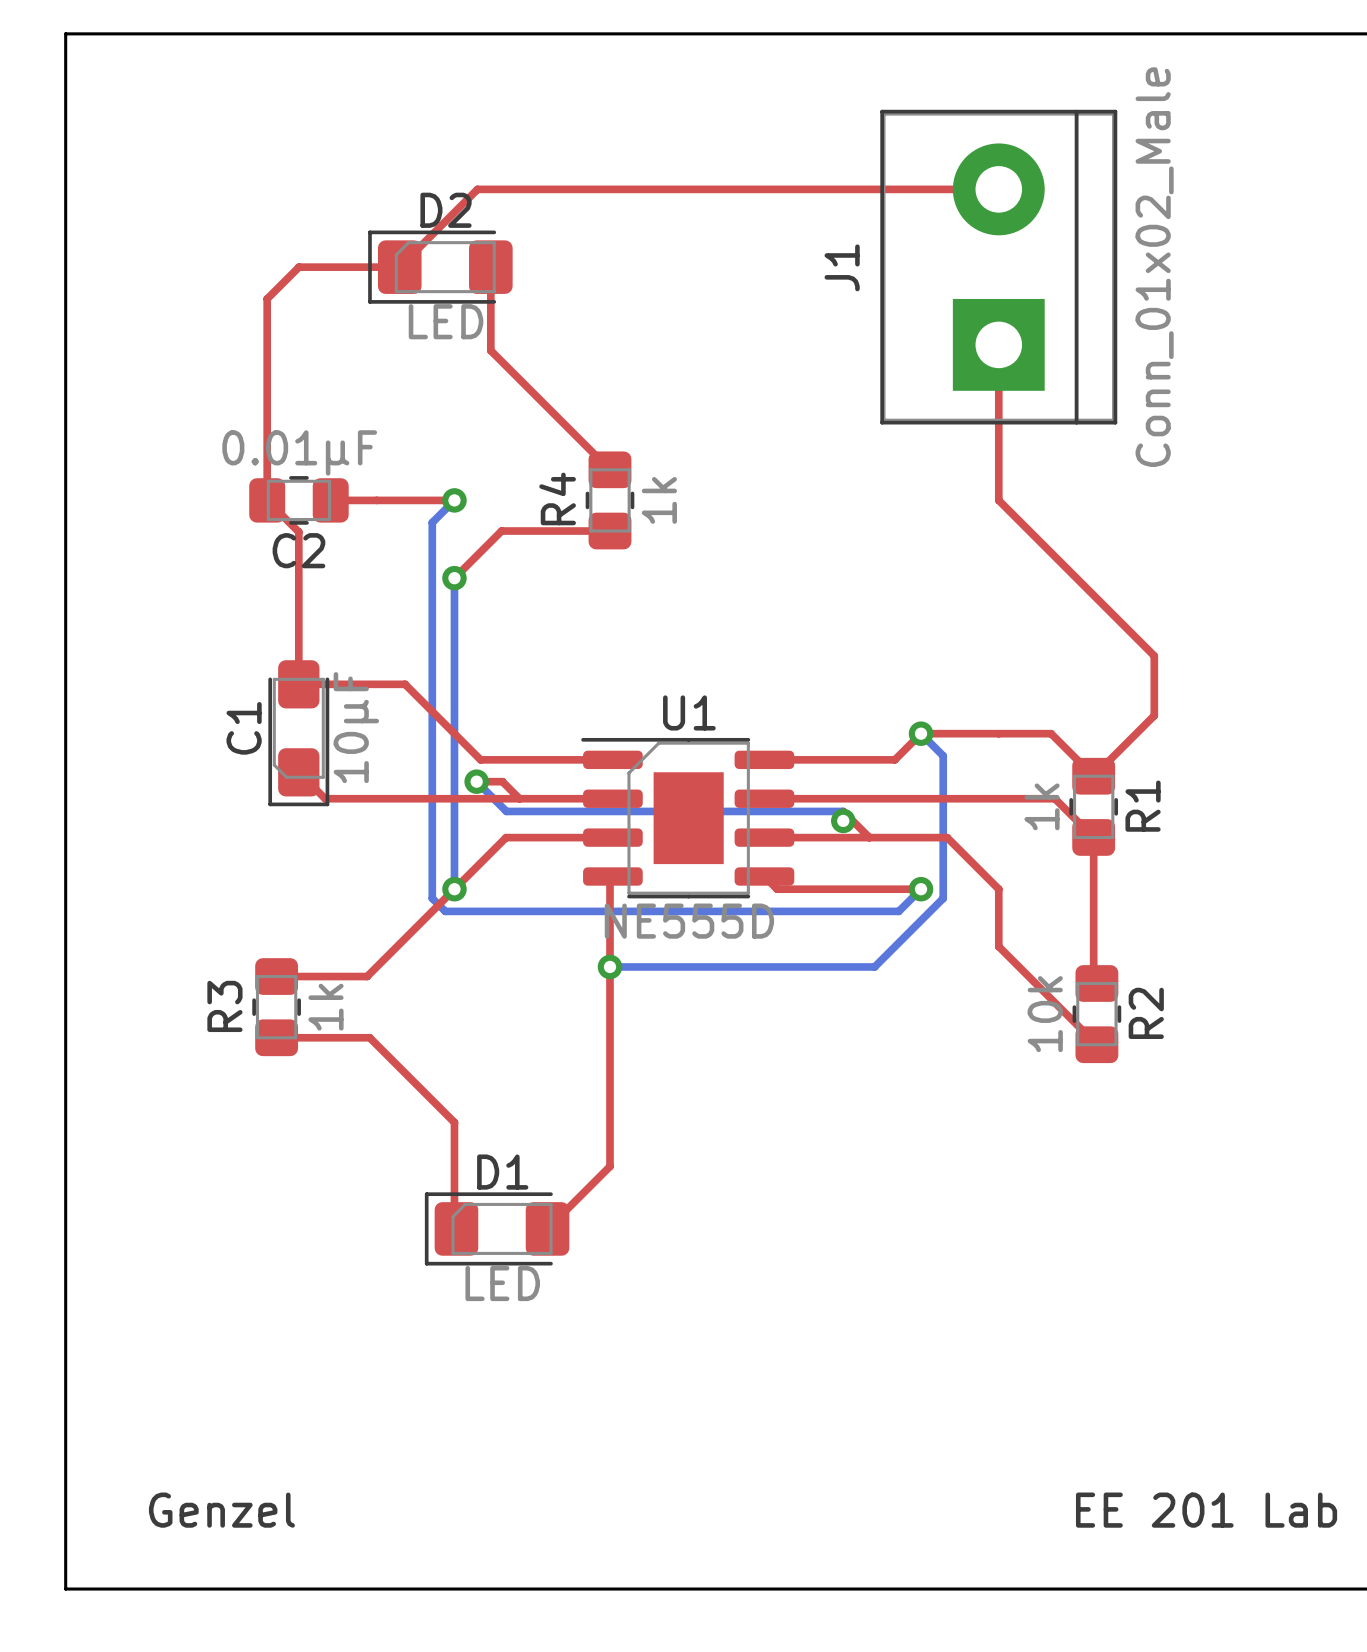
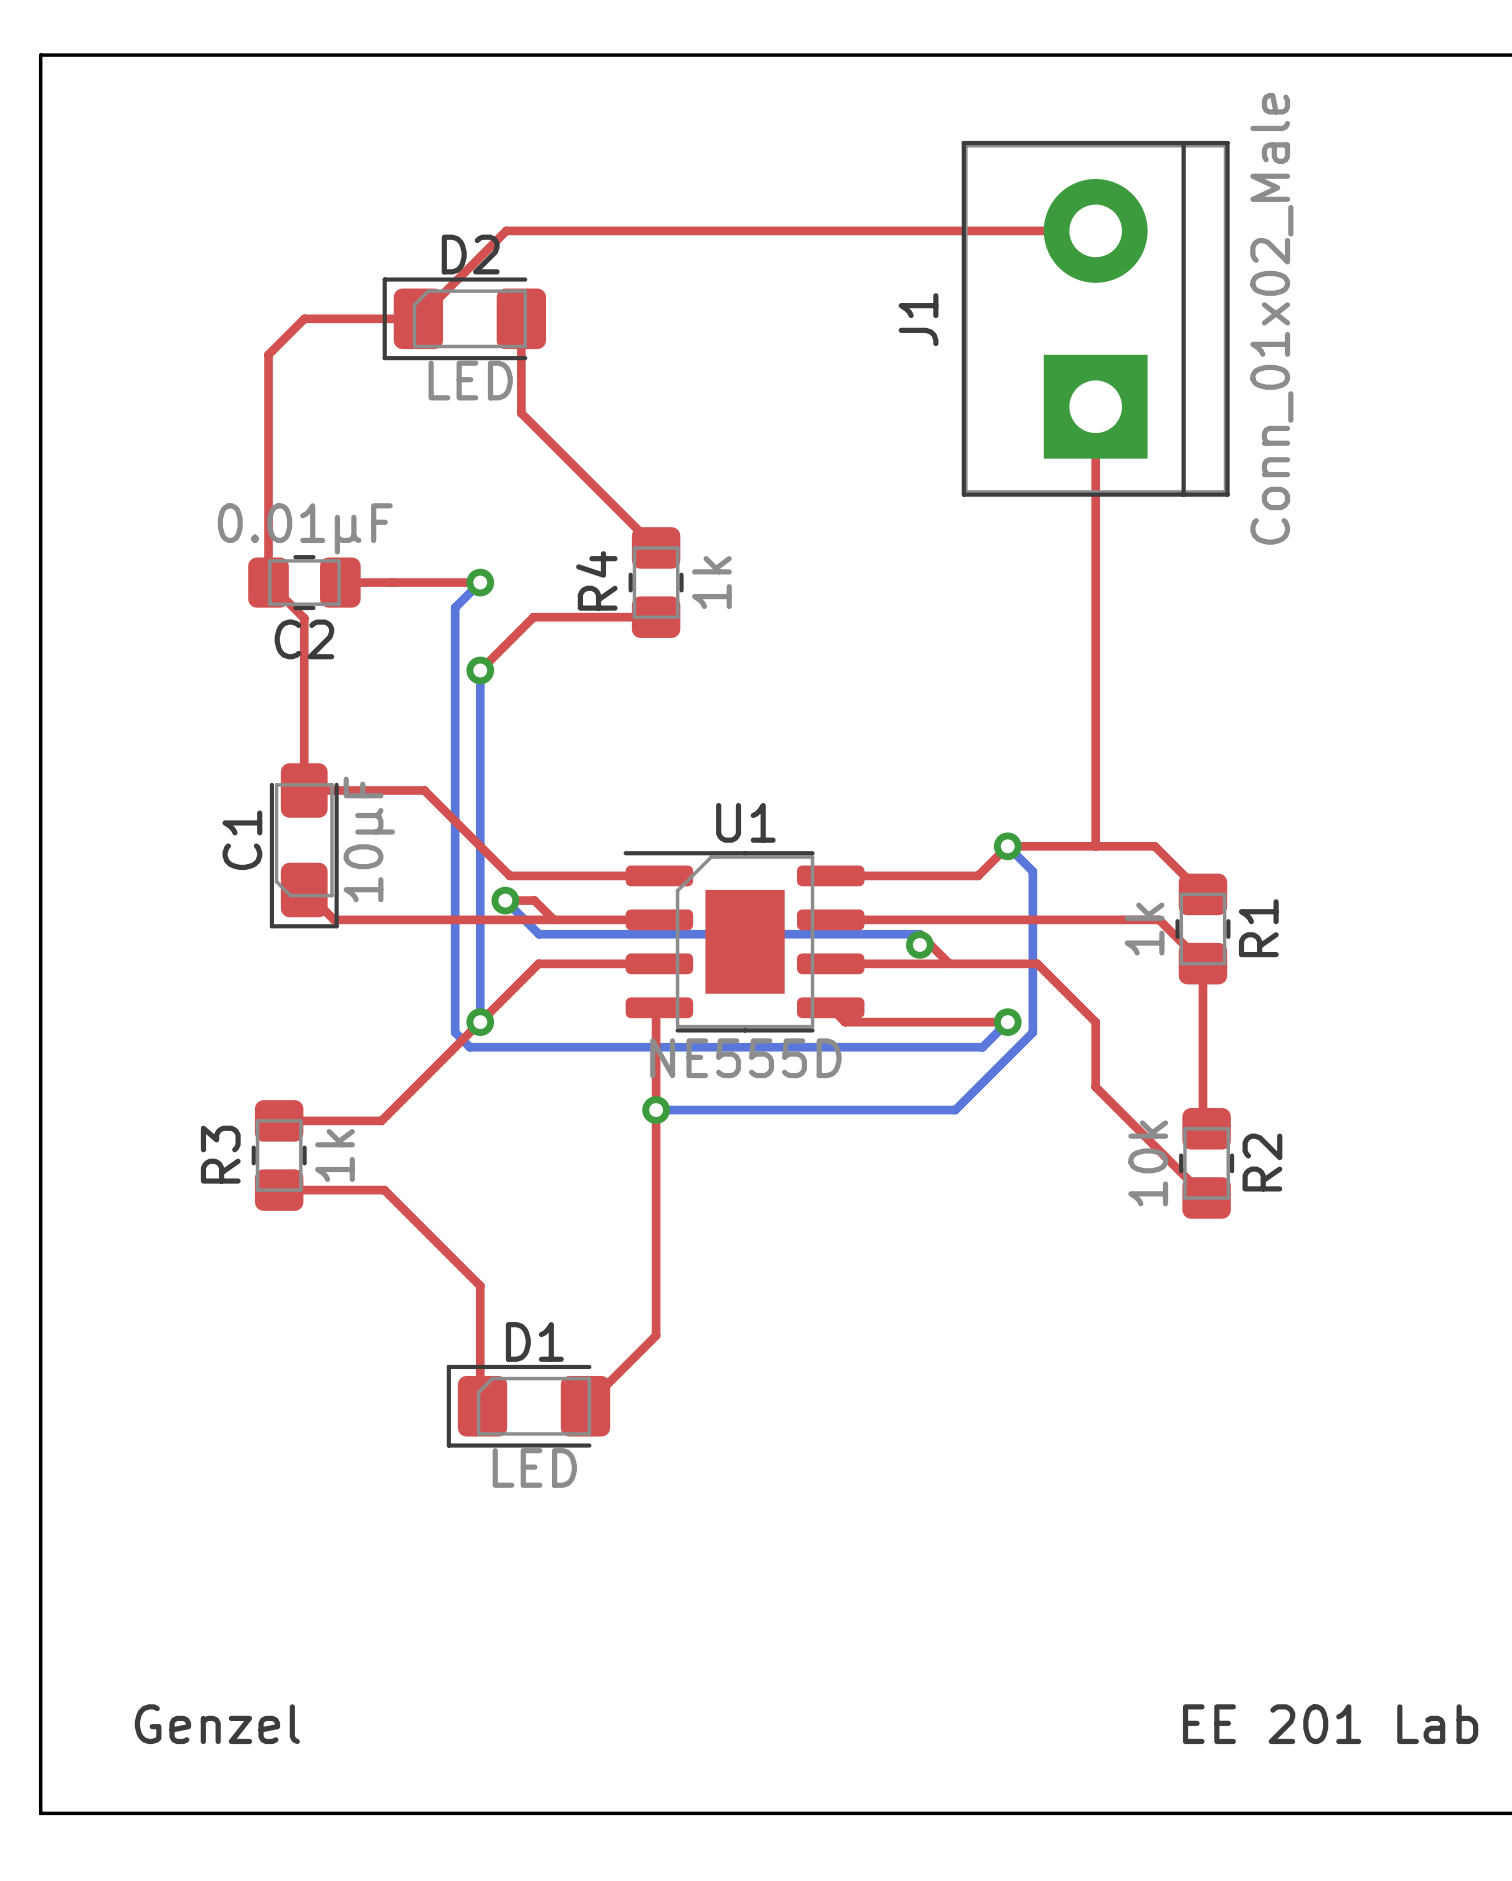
top track: (998, 500) (1154, 655) (1154, 715) (1093, 776) -> (1095, 582) (1095, 846)

